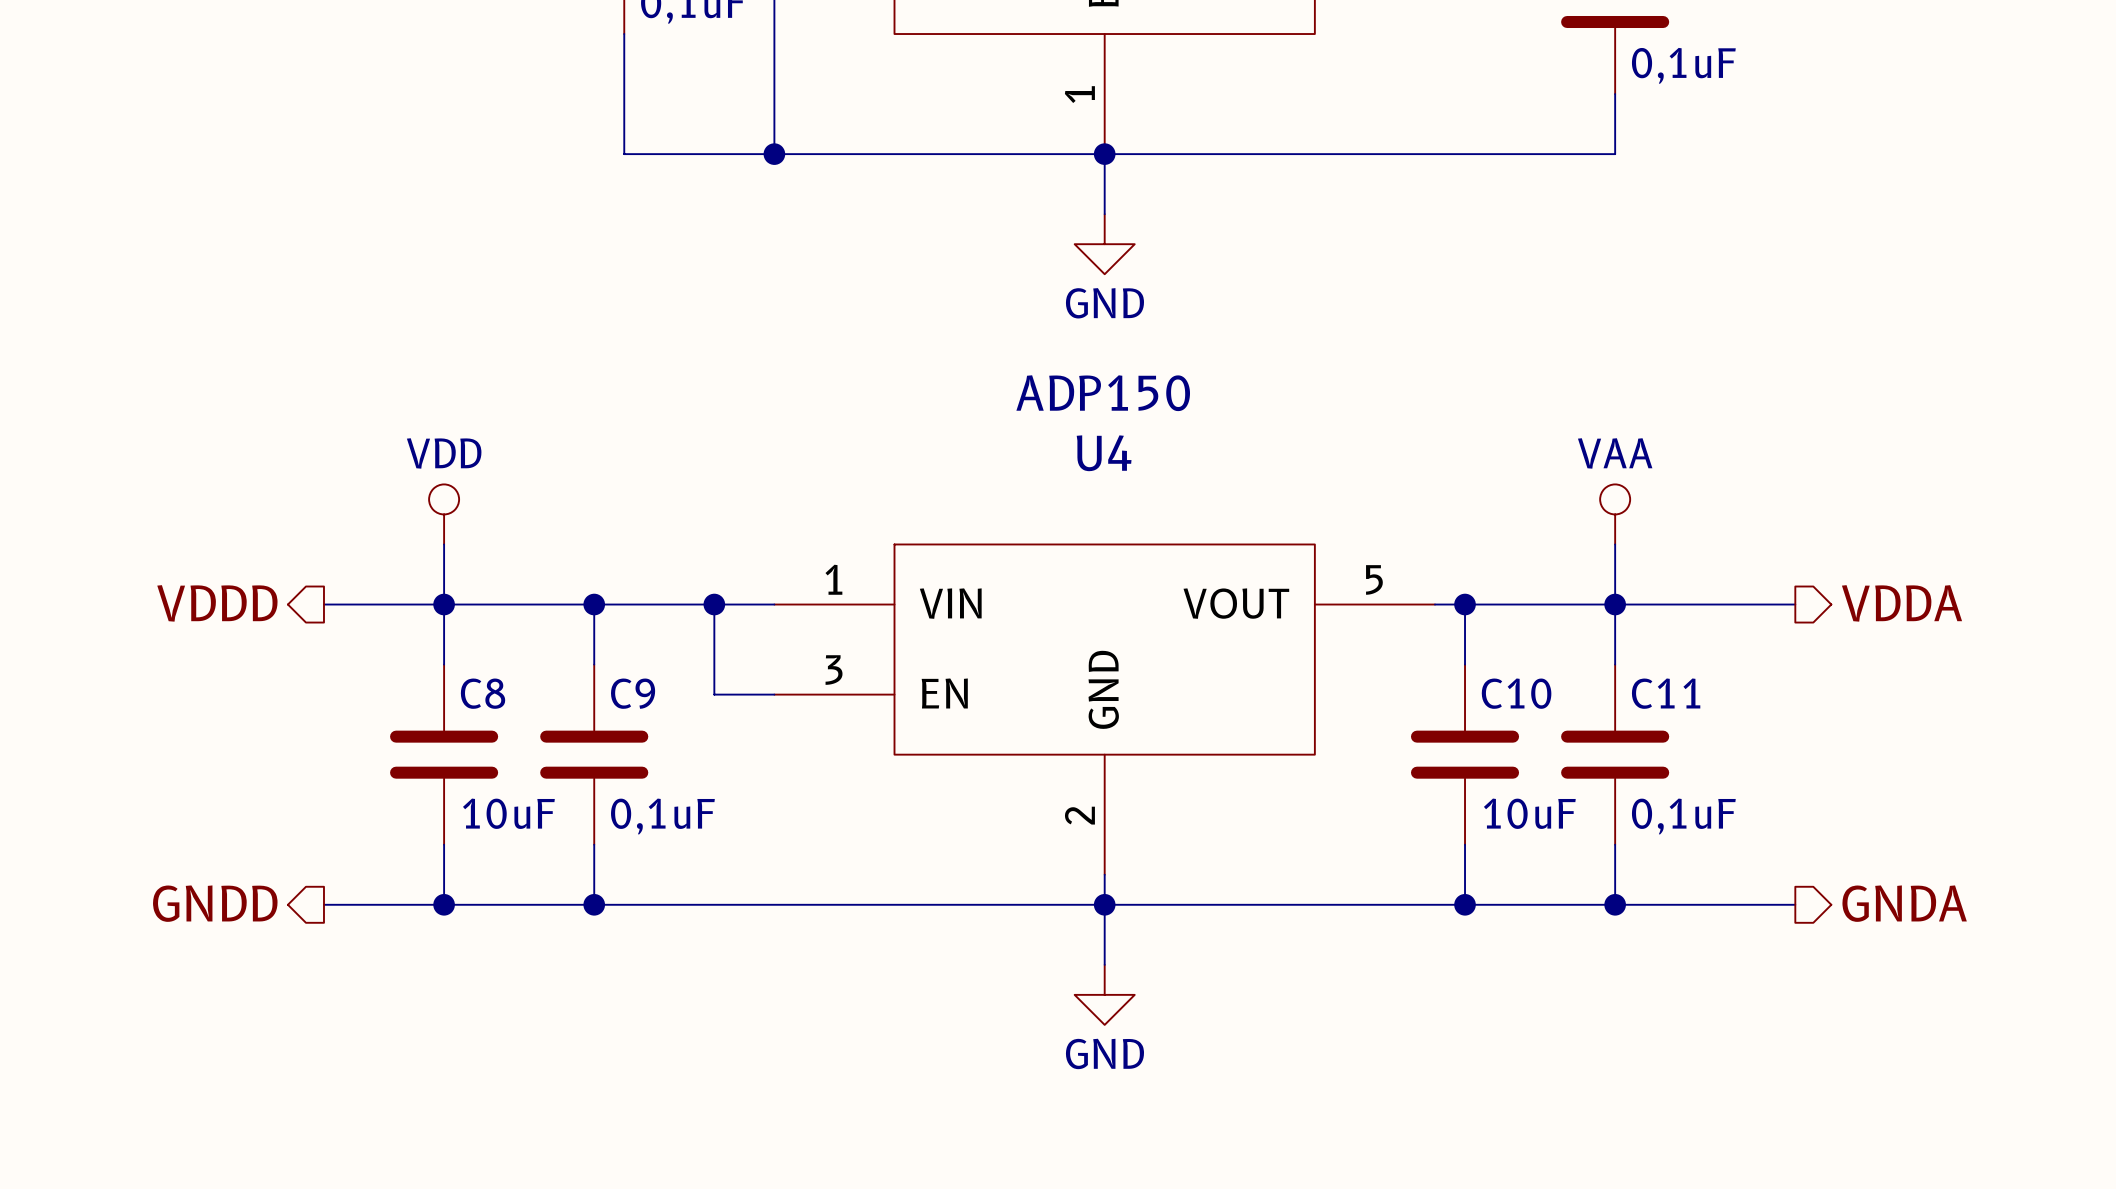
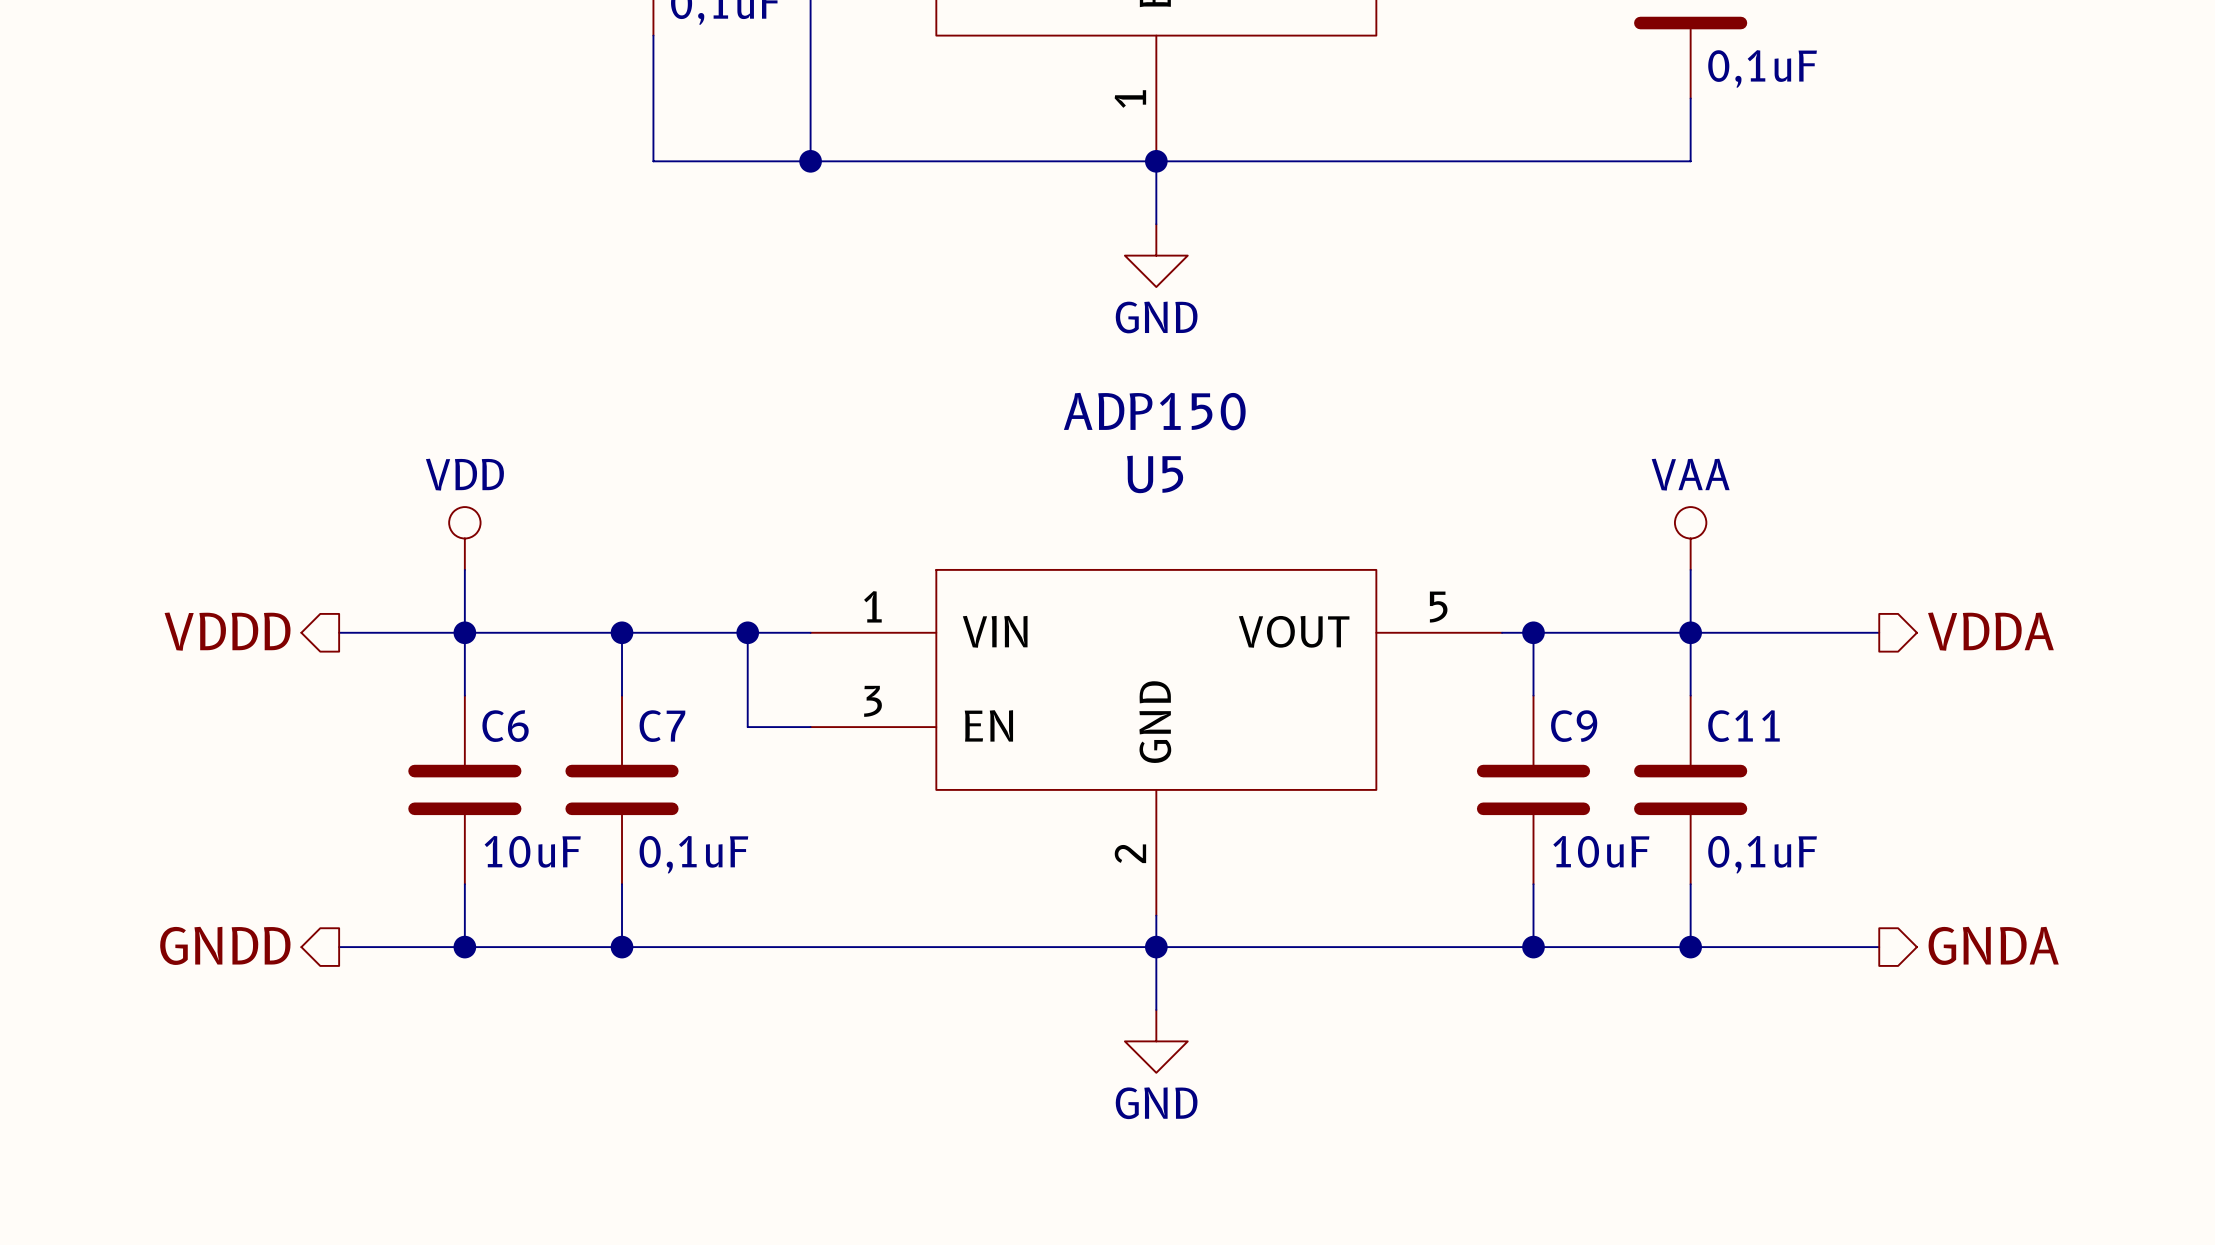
U4 name: U4 (1104, 453) -> U5 (1155, 474)
C8 name: C8 (483, 693) -> C6 (505, 726)
C9 name: C9 (633, 693) -> C7 (662, 726)
C10 name: C10 (1516, 693) -> C9 (1574, 726)

